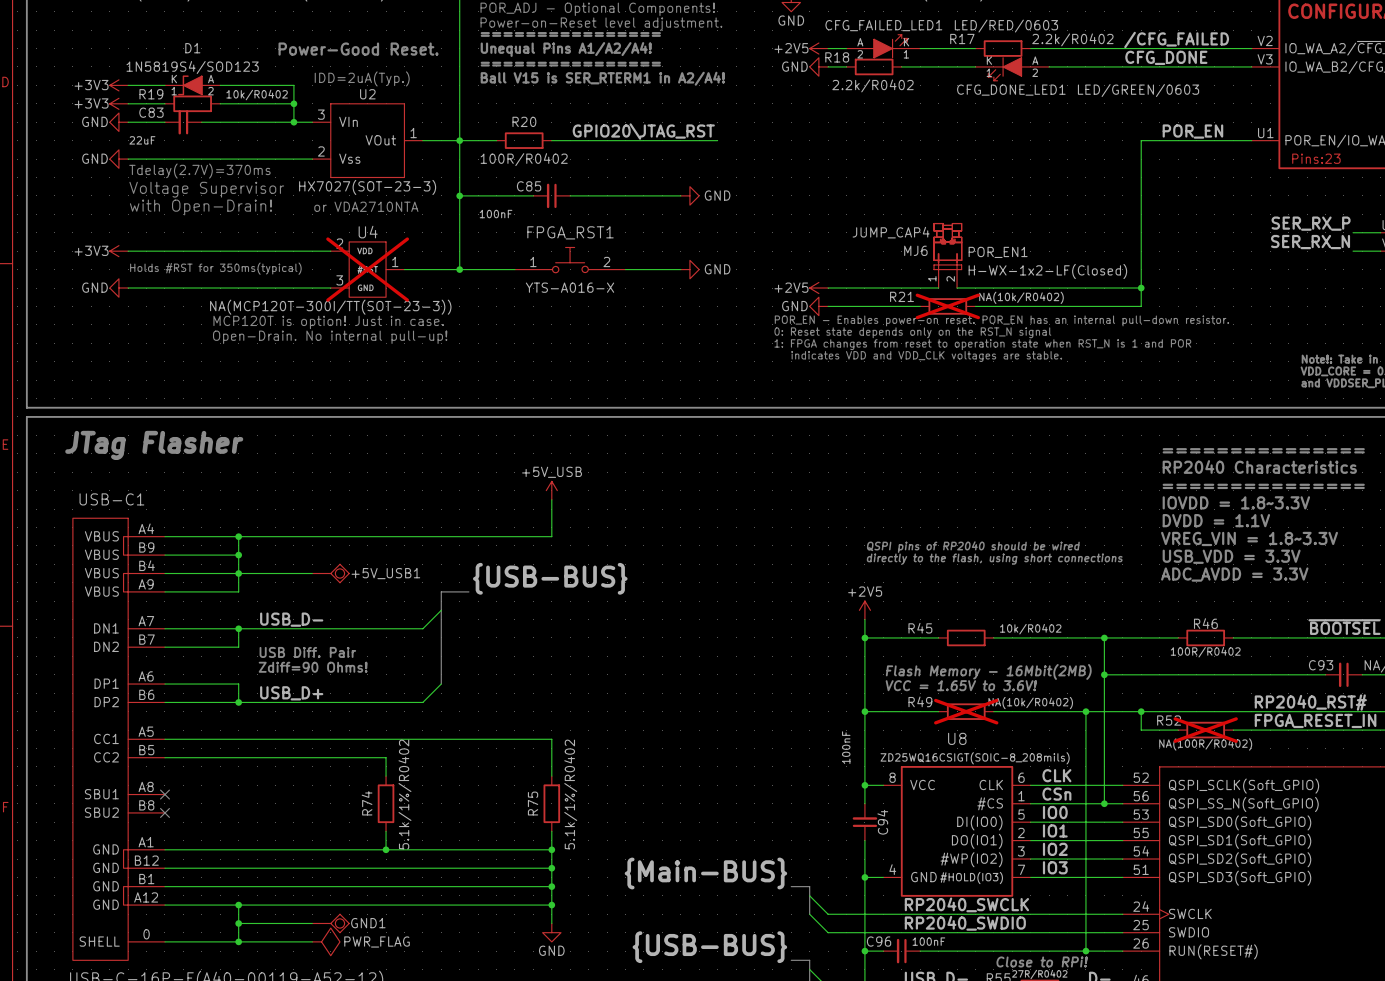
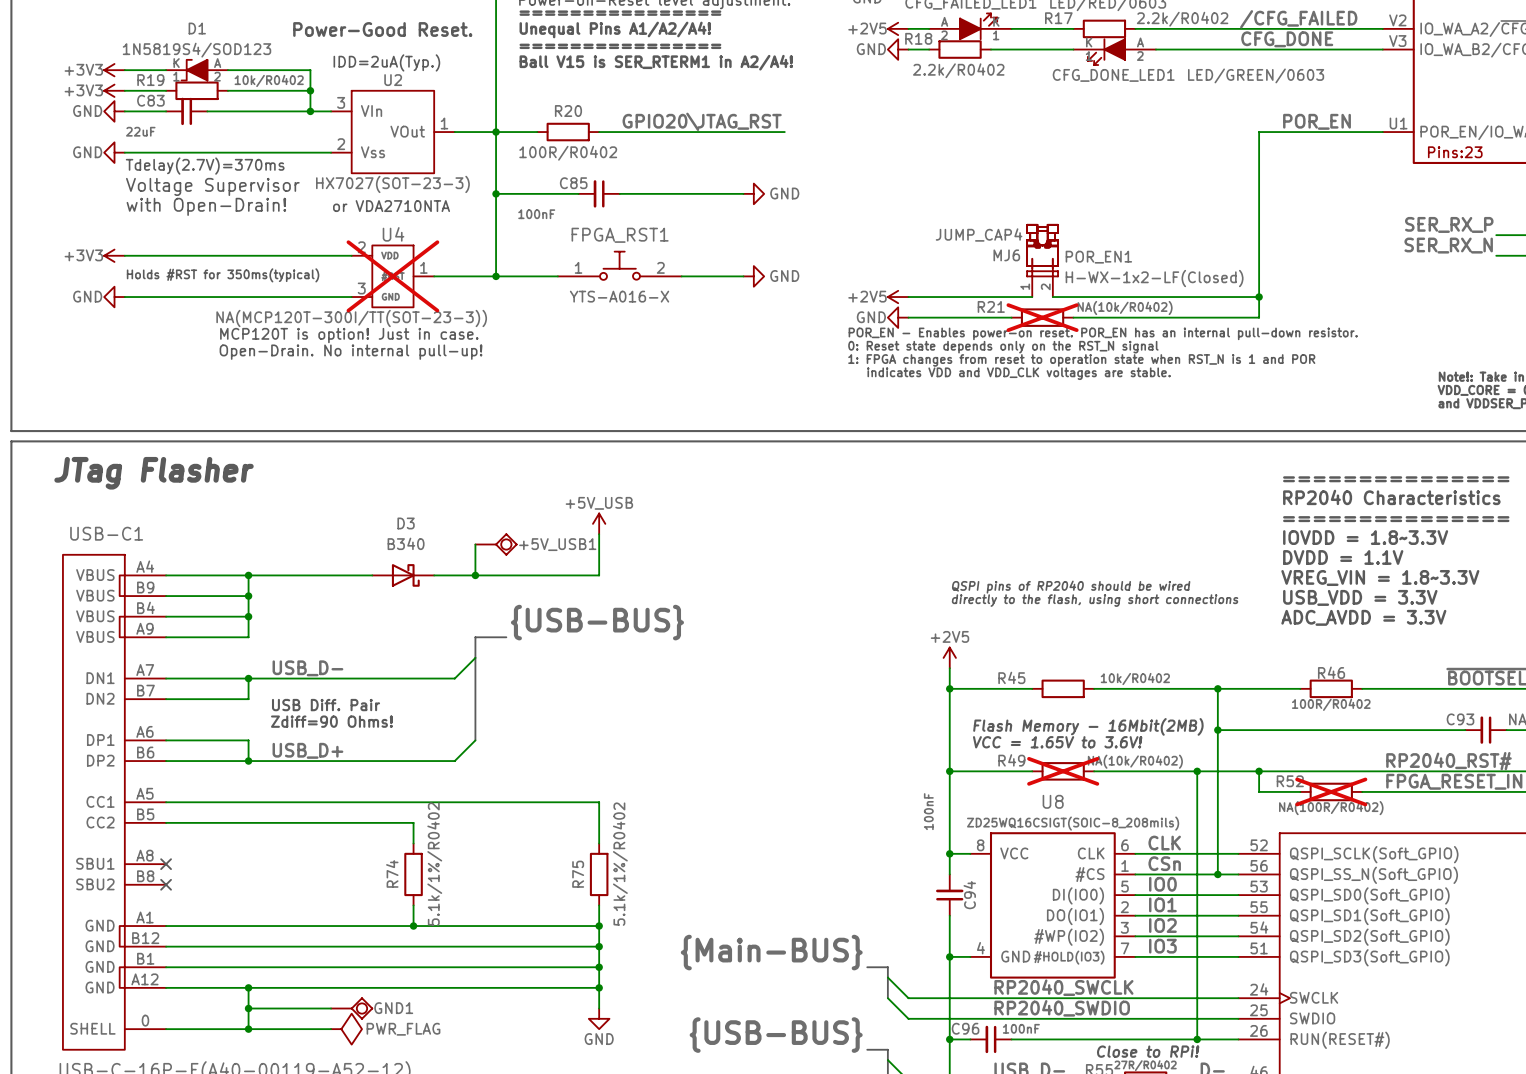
wire: none -> (475, 544) (475, 575)
D3: none -> B340 (403, 575)
junction: none -> (475, 575)
wire: (238, 573) (312, 573) -> none
+5V_USB1 position: (330, 573) -> (496, 544)

